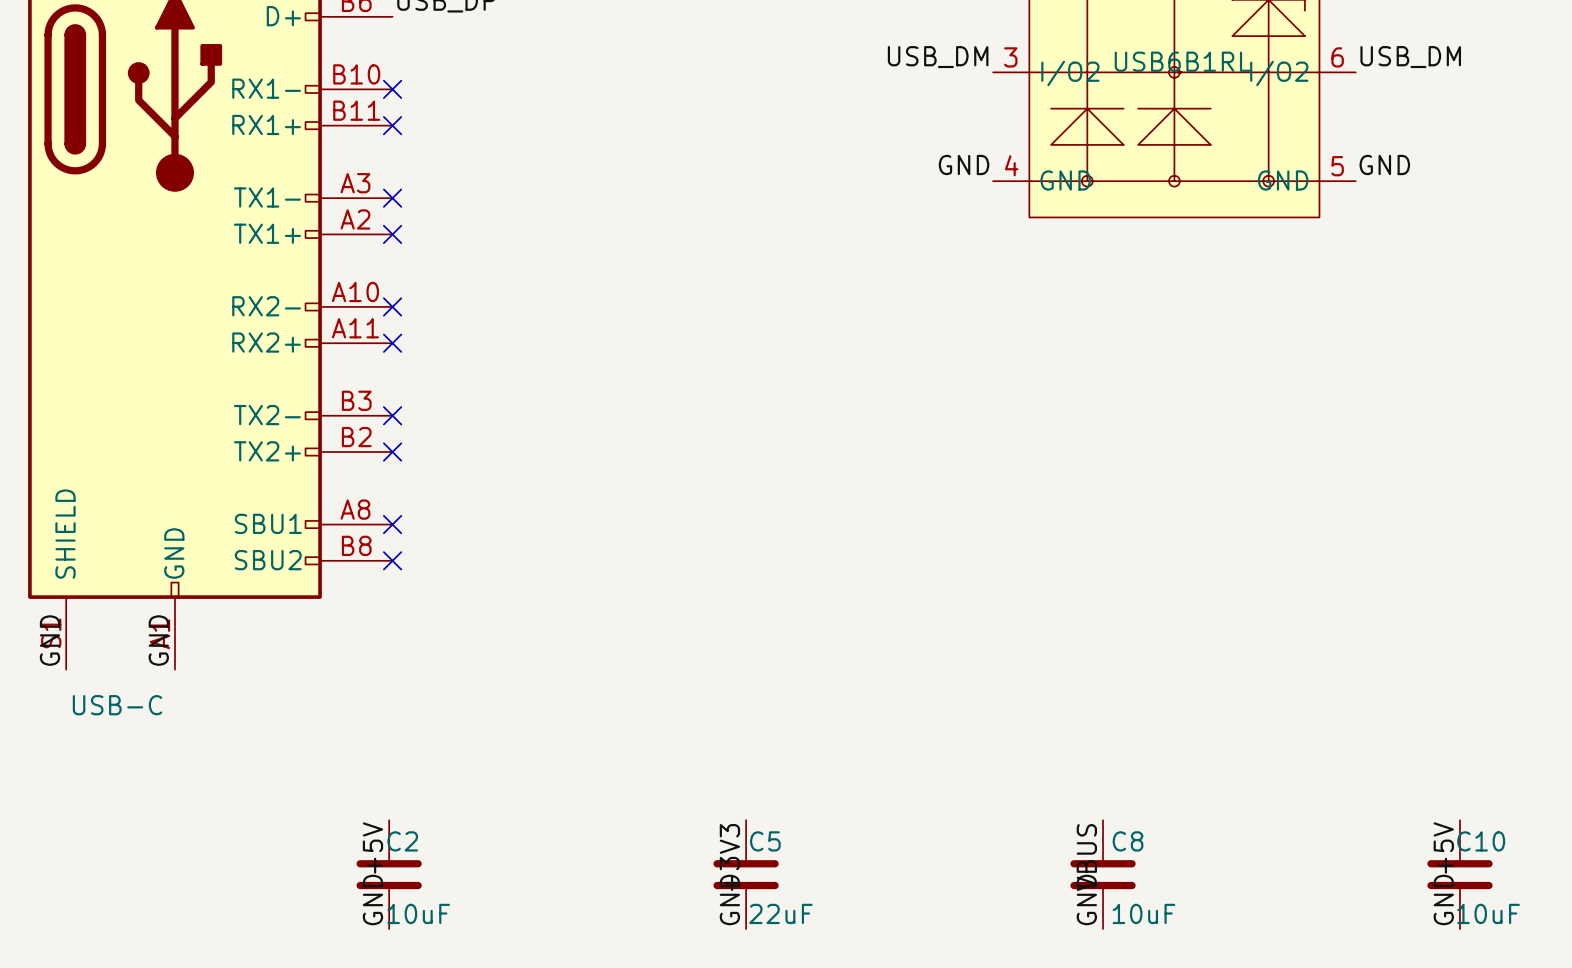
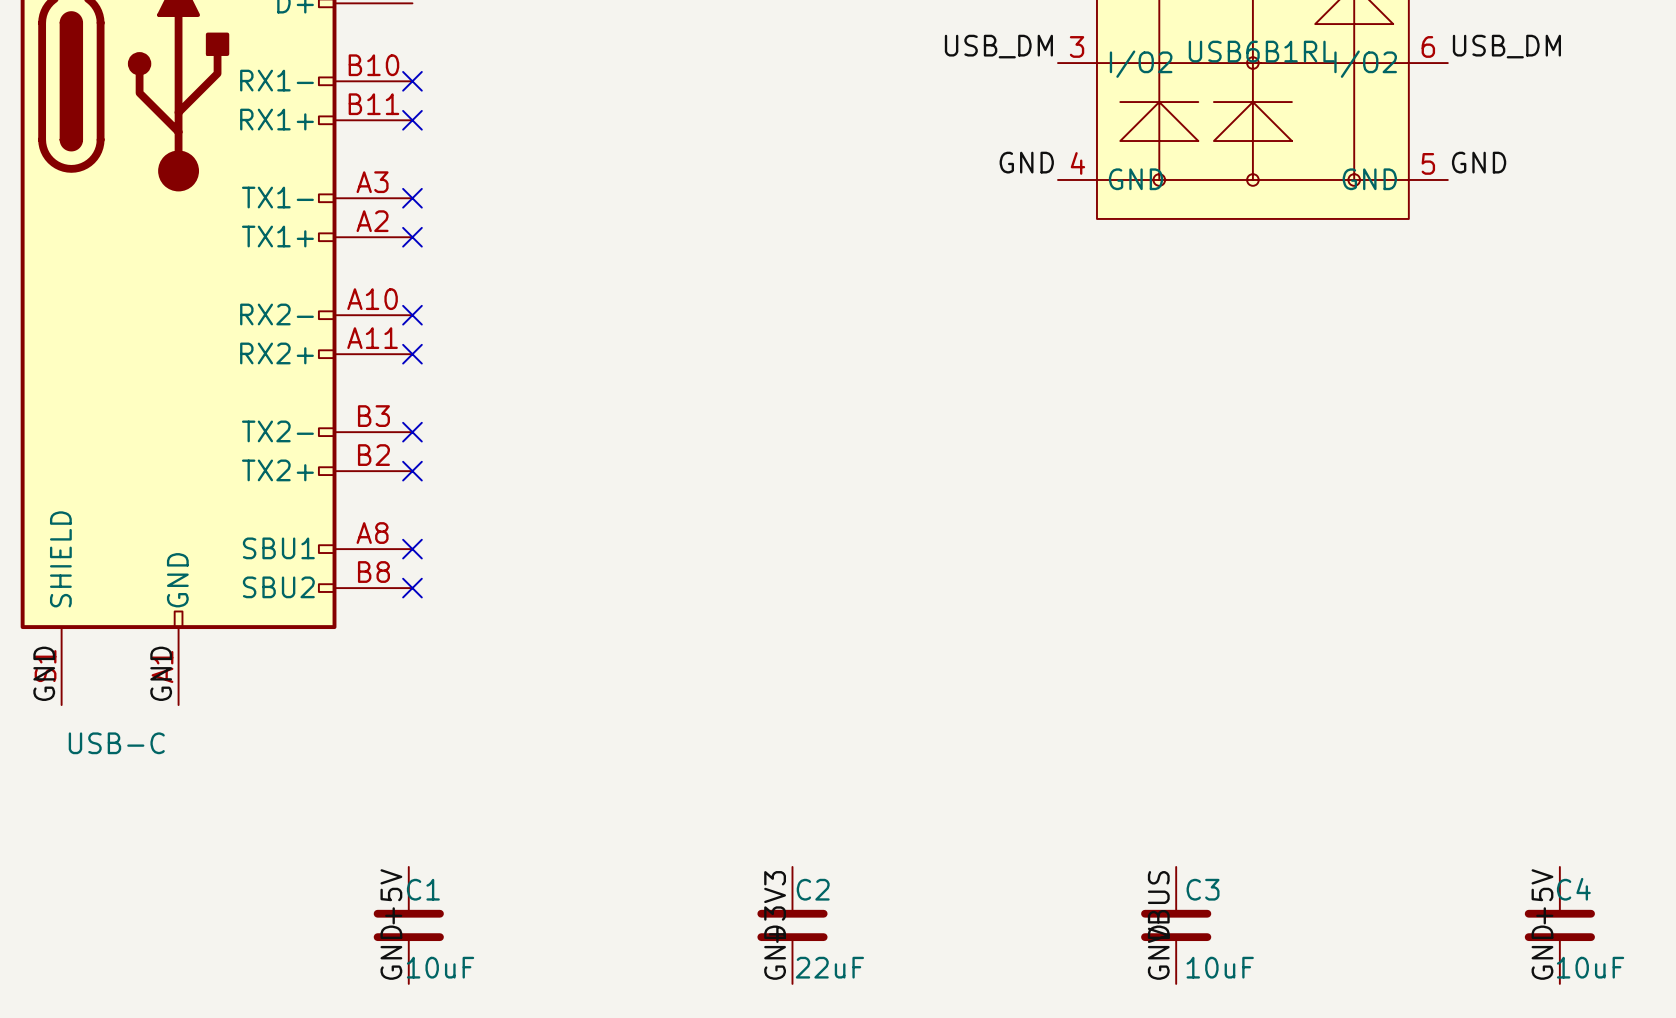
C2 name: C2 (402, 841) -> C1 (423, 889)
C5 name: C5 (765, 841) -> C2 (813, 889)
C8 name: C8 (1128, 841) -> C3 (1203, 889)
C10 name: C10 (1481, 841) -> C4 (1573, 889)

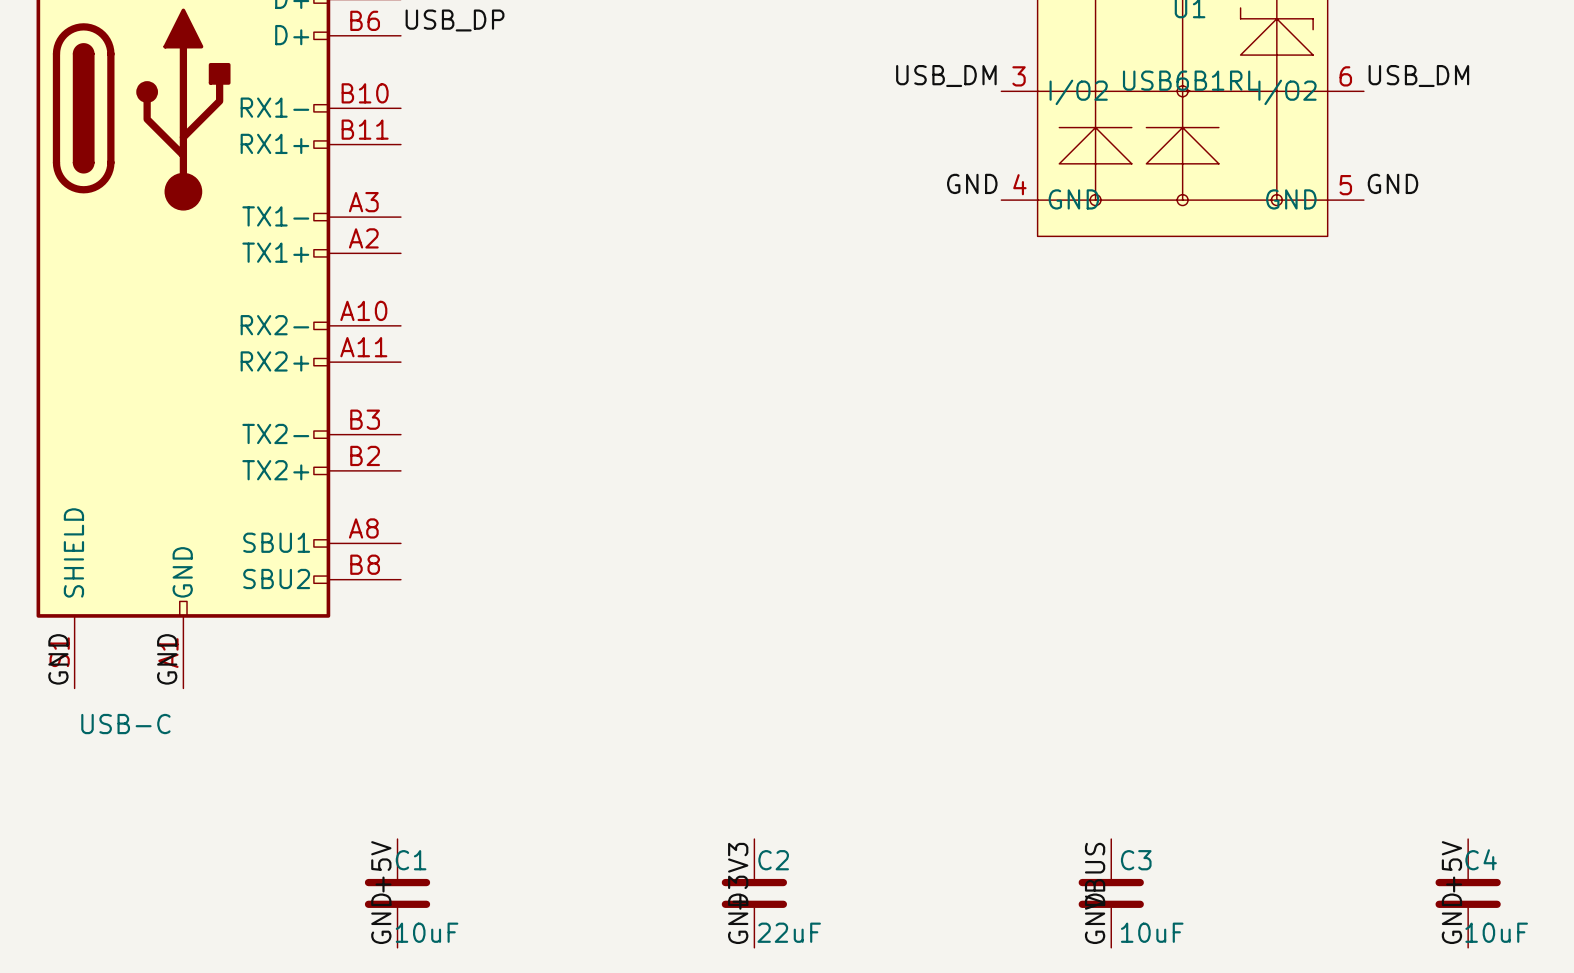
no-connect mark: (412, 81) -> none
no-connect mark: (412, 120) -> none
no-connect mark: (412, 198) -> none
no-connect mark: (412, 237) -> none
no-connect mark: (412, 315) -> none
no-connect mark: (412, 354) -> none
no-connect mark: (412, 432) -> none
no-connect mark: (412, 471) -> none
no-connect mark: (412, 549) -> none
no-connect mark: (412, 588) -> none

